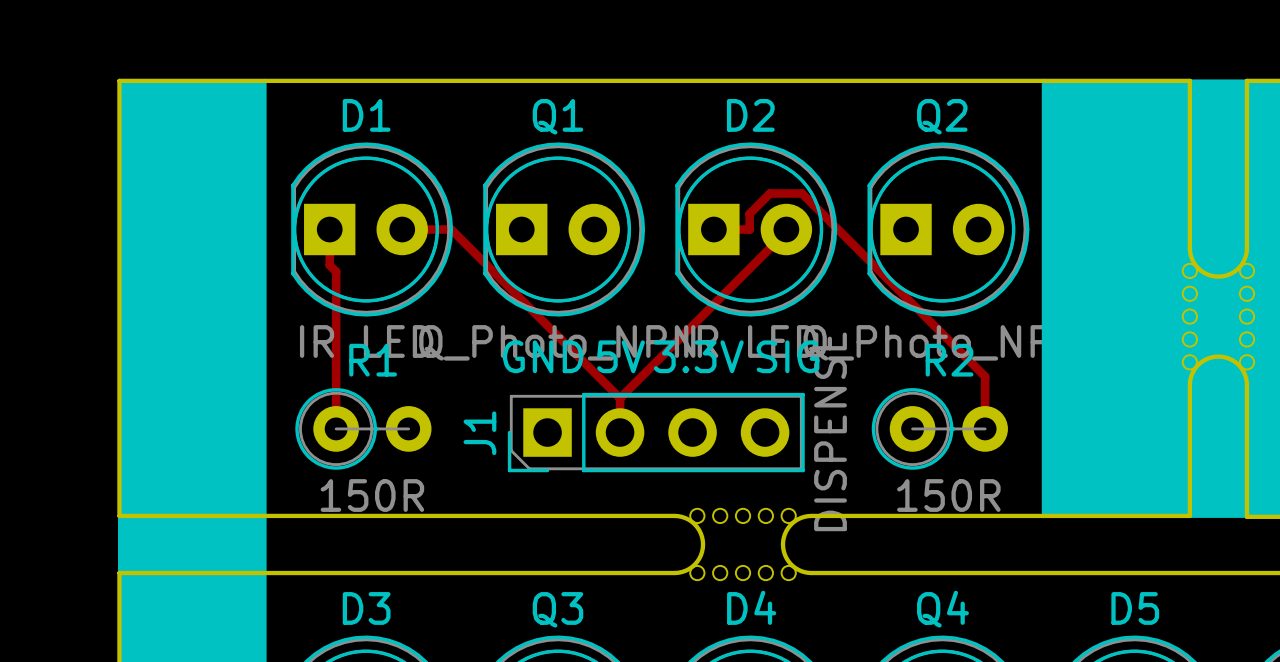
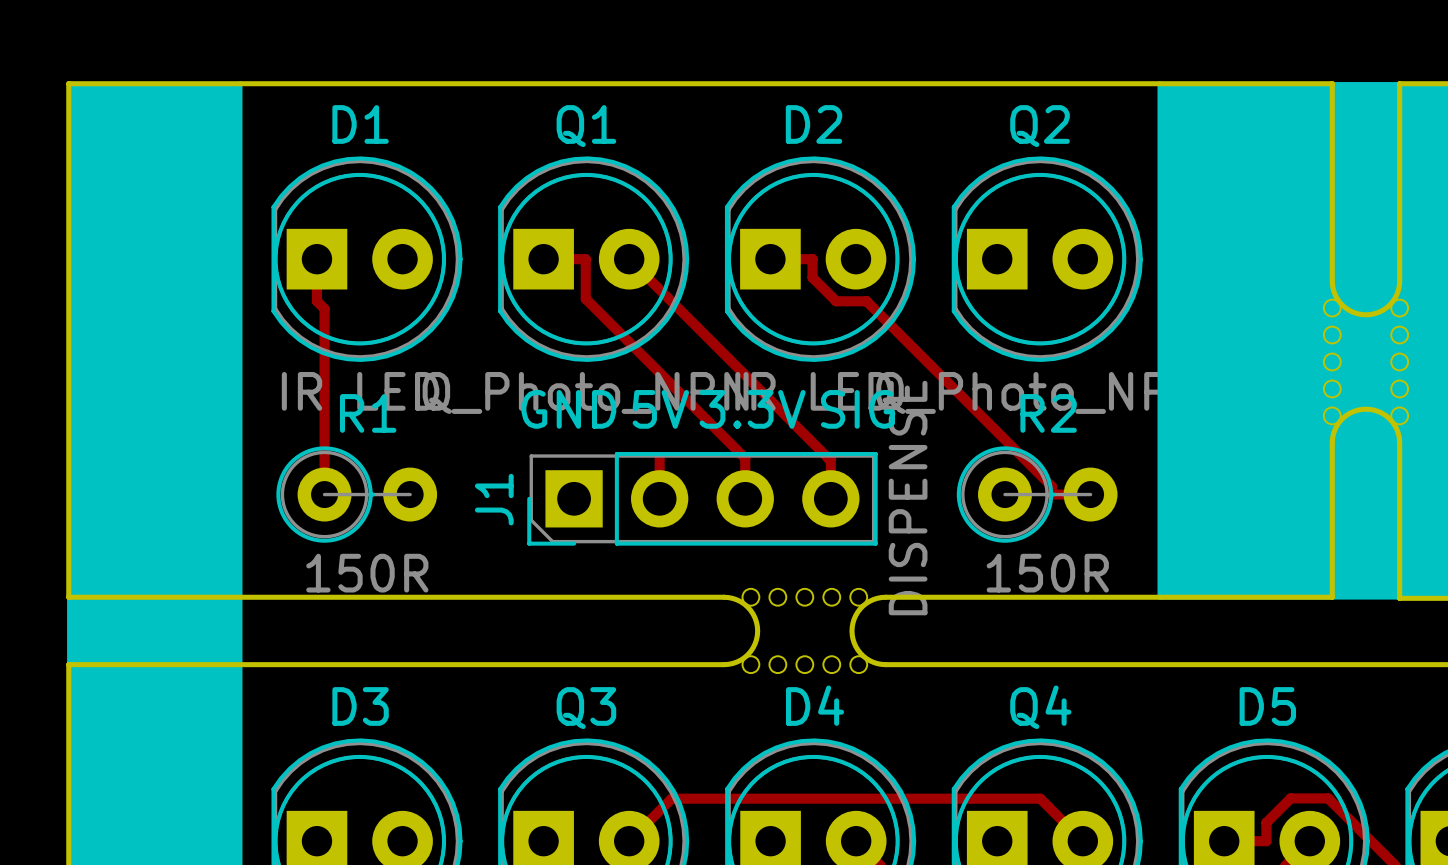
track: (402, 229) (451, 229) (620, 398) (786, 231) (786, 229) -> none
track: none -> (543, 259) (585, 259) (585, 298) (745, 458) (745, 498)
track: none -> (629, 259) (828, 458) (830, 458) (830, 498)
track: (749, 229) (749, 213) (769, 193) (802, 193) (985, 376) (985, 428) -> (812, 259) (812, 277) (836, 301) (866, 301) (1051, 486) (1051, 494) (1090, 494)

